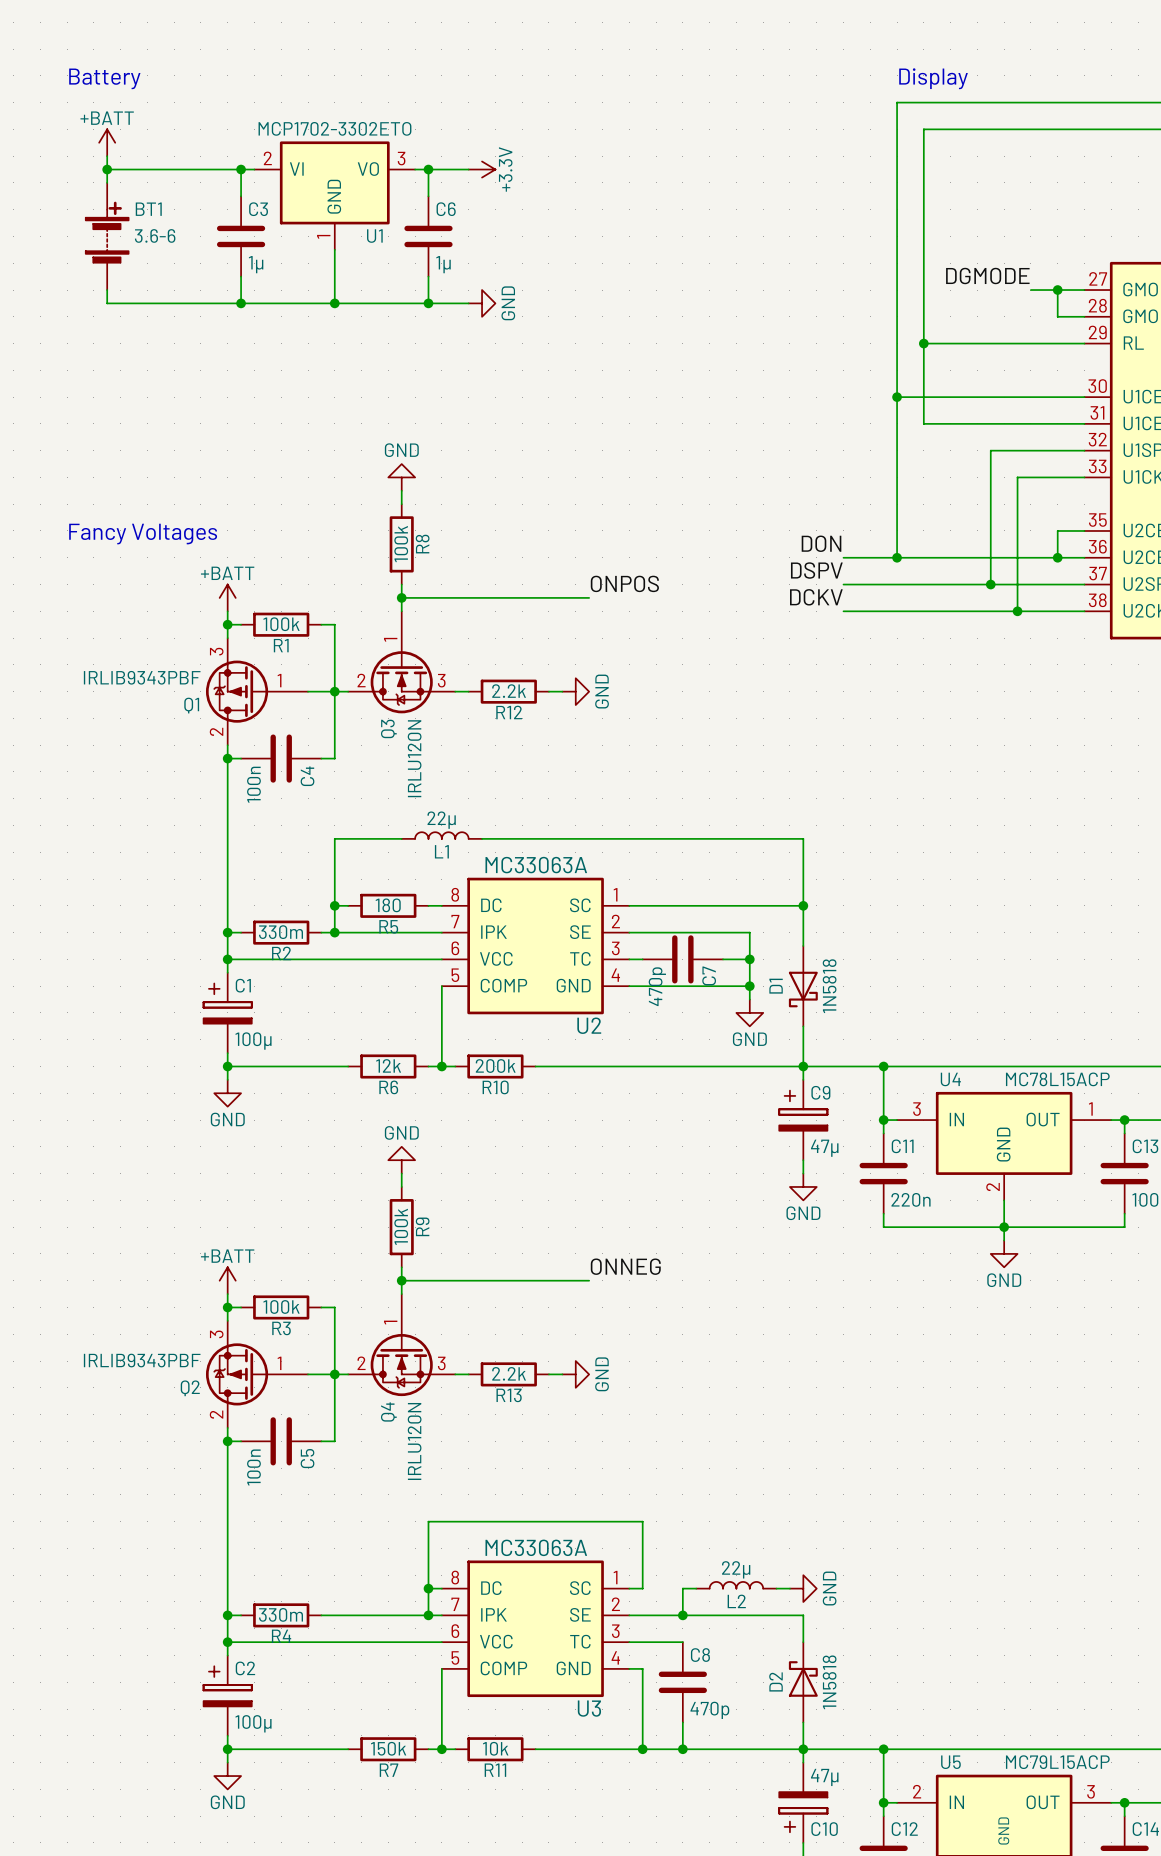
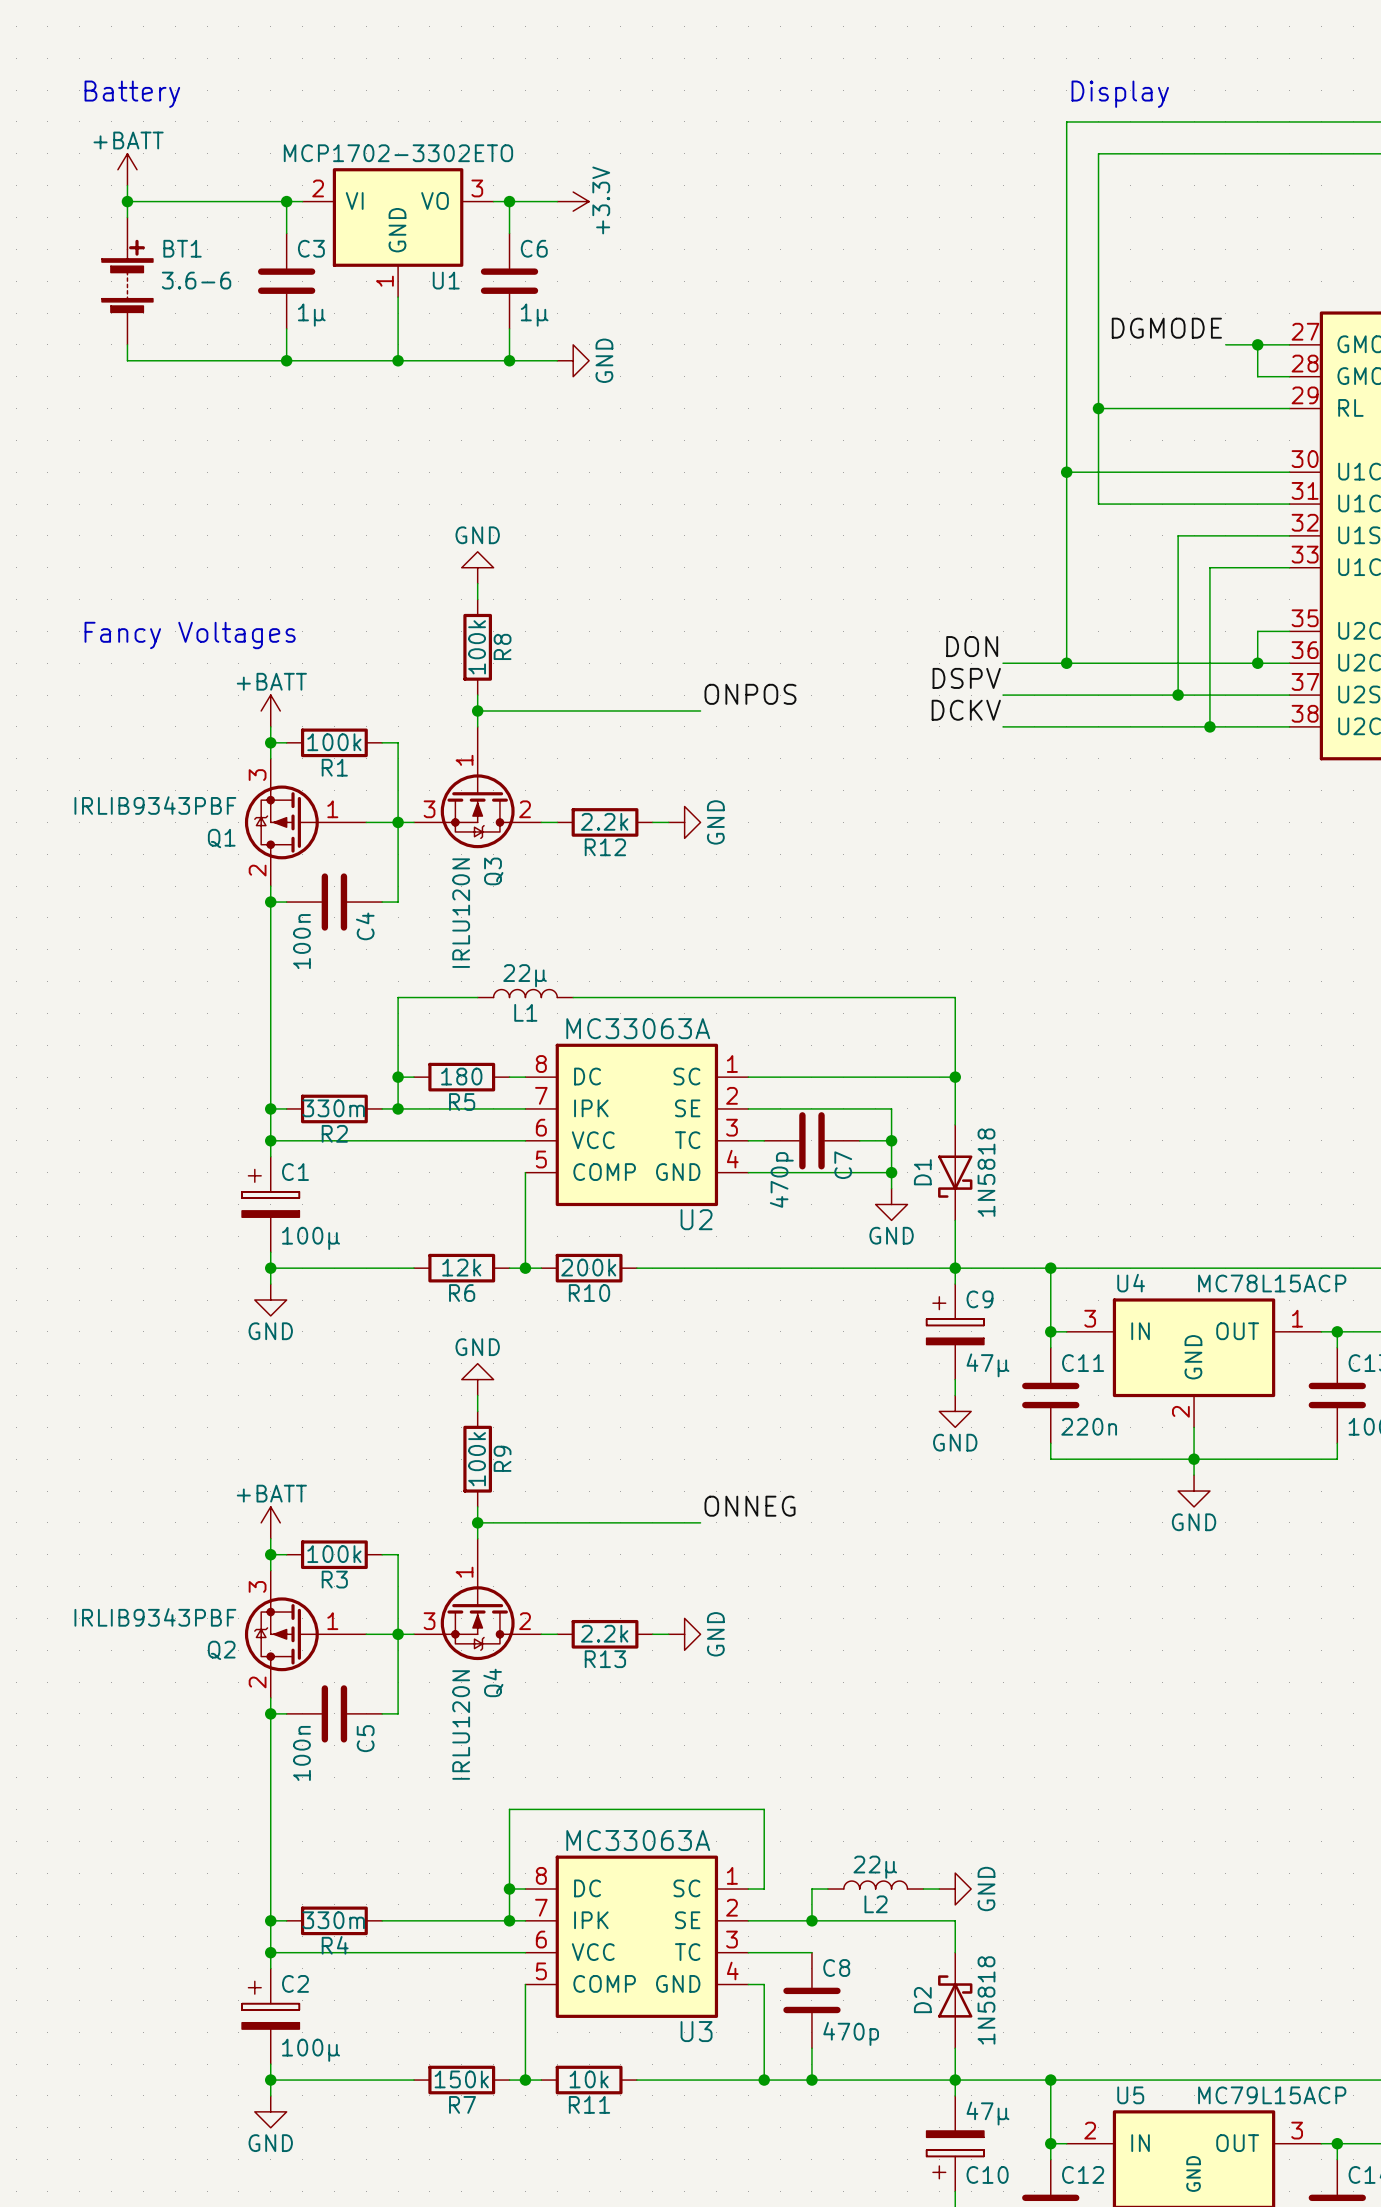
Q3 flip: as is (401, 682) -> left-right (477, 811)
Q4 flip: as is (401, 1365) -> left-right (477, 1623)

